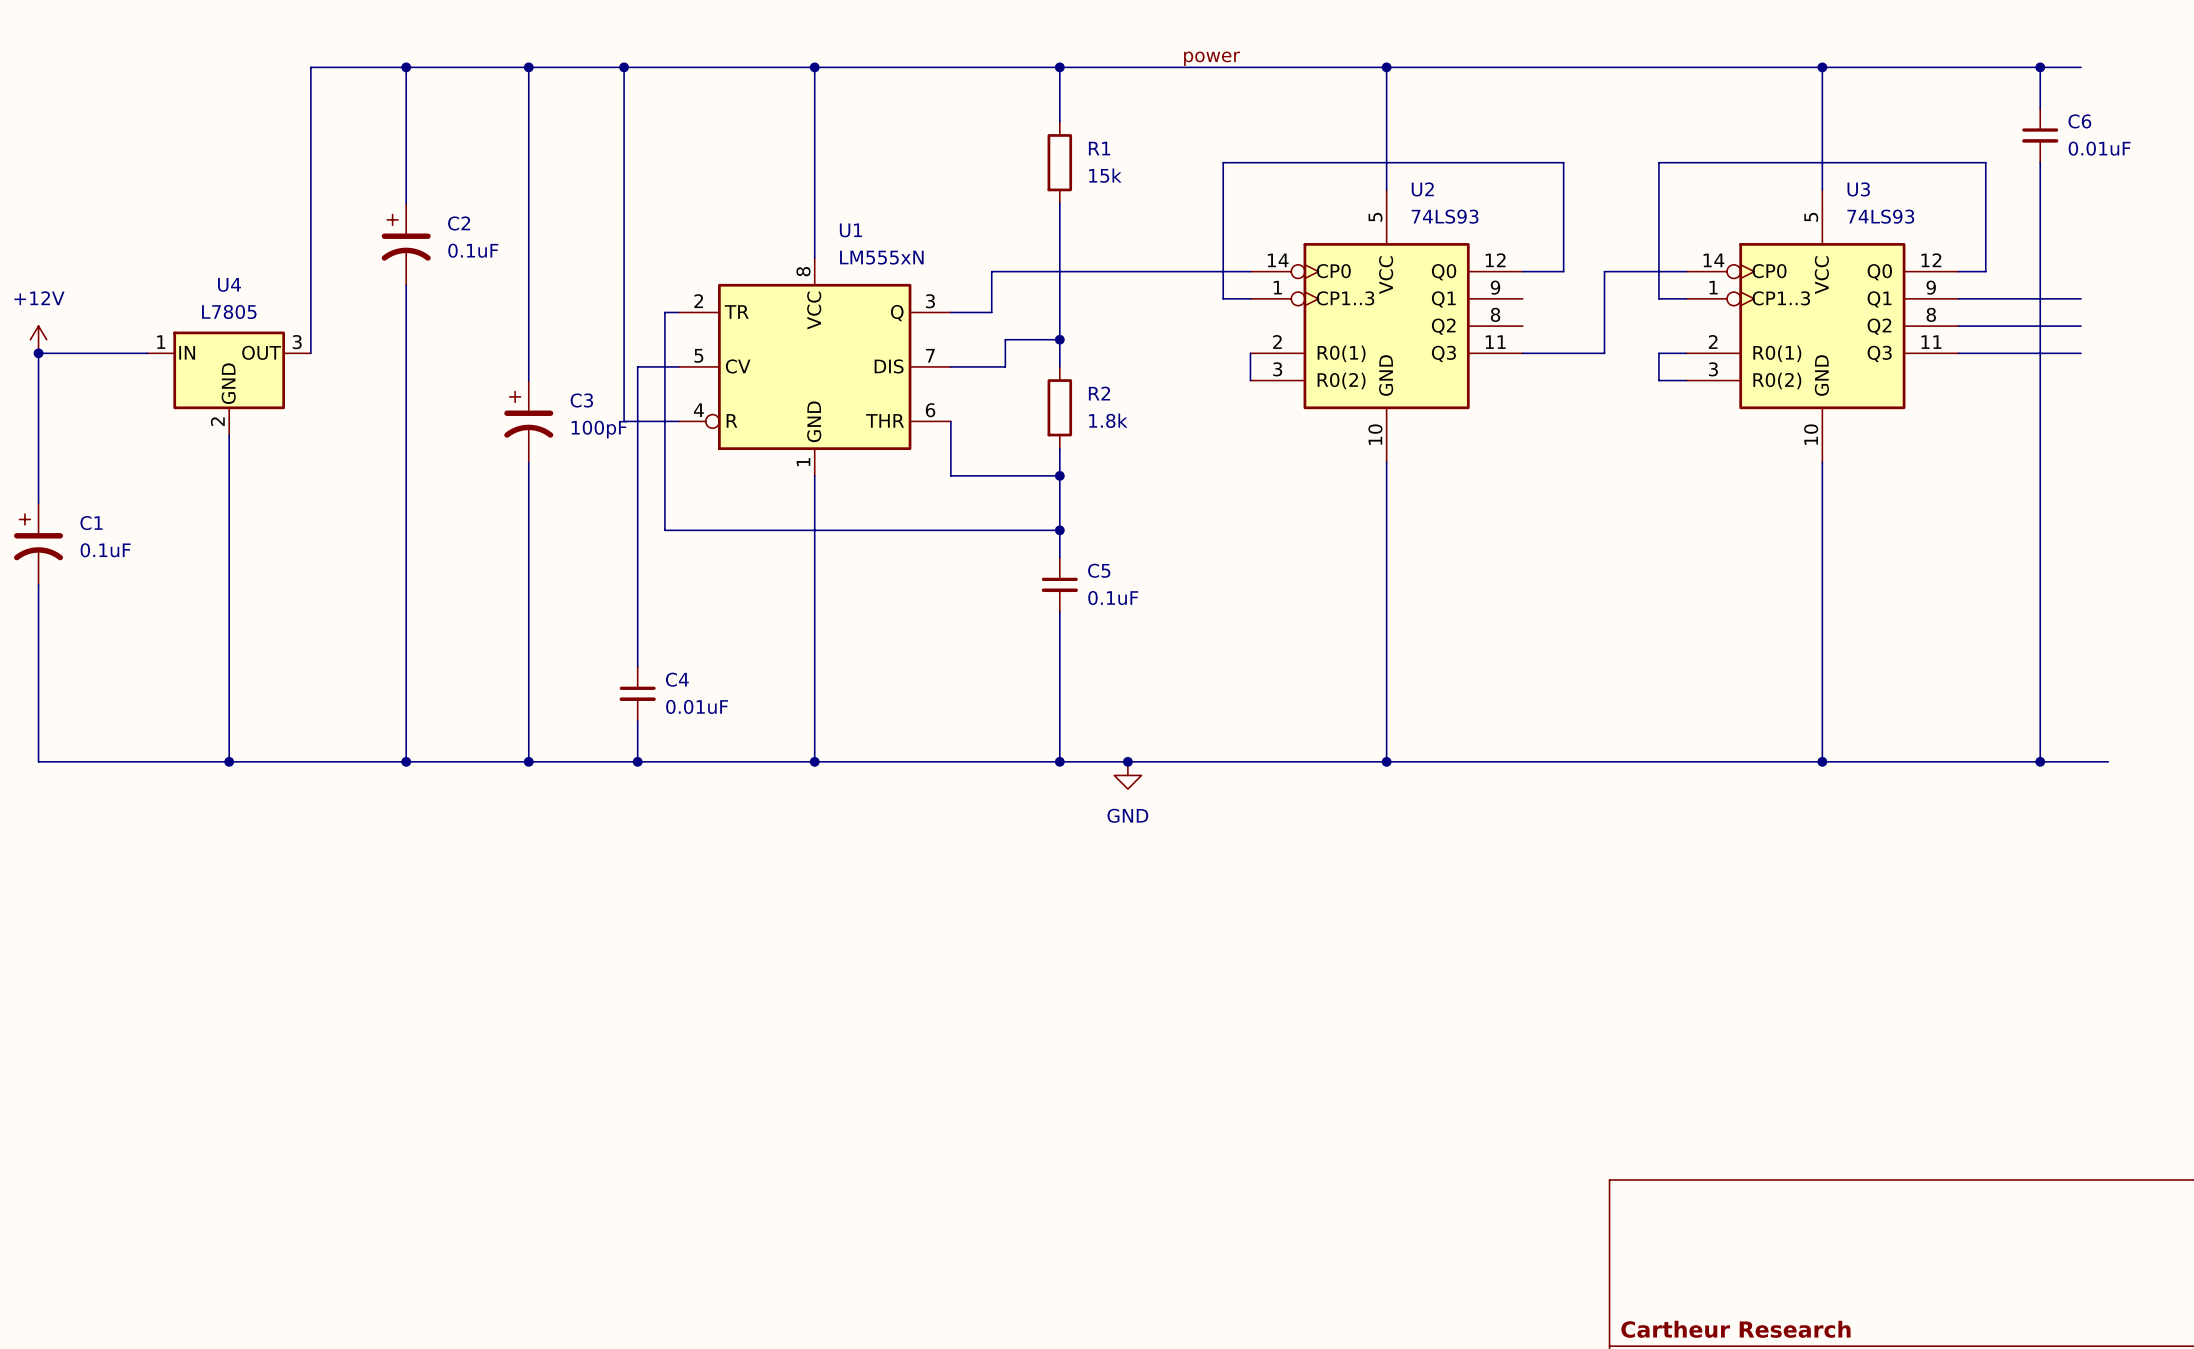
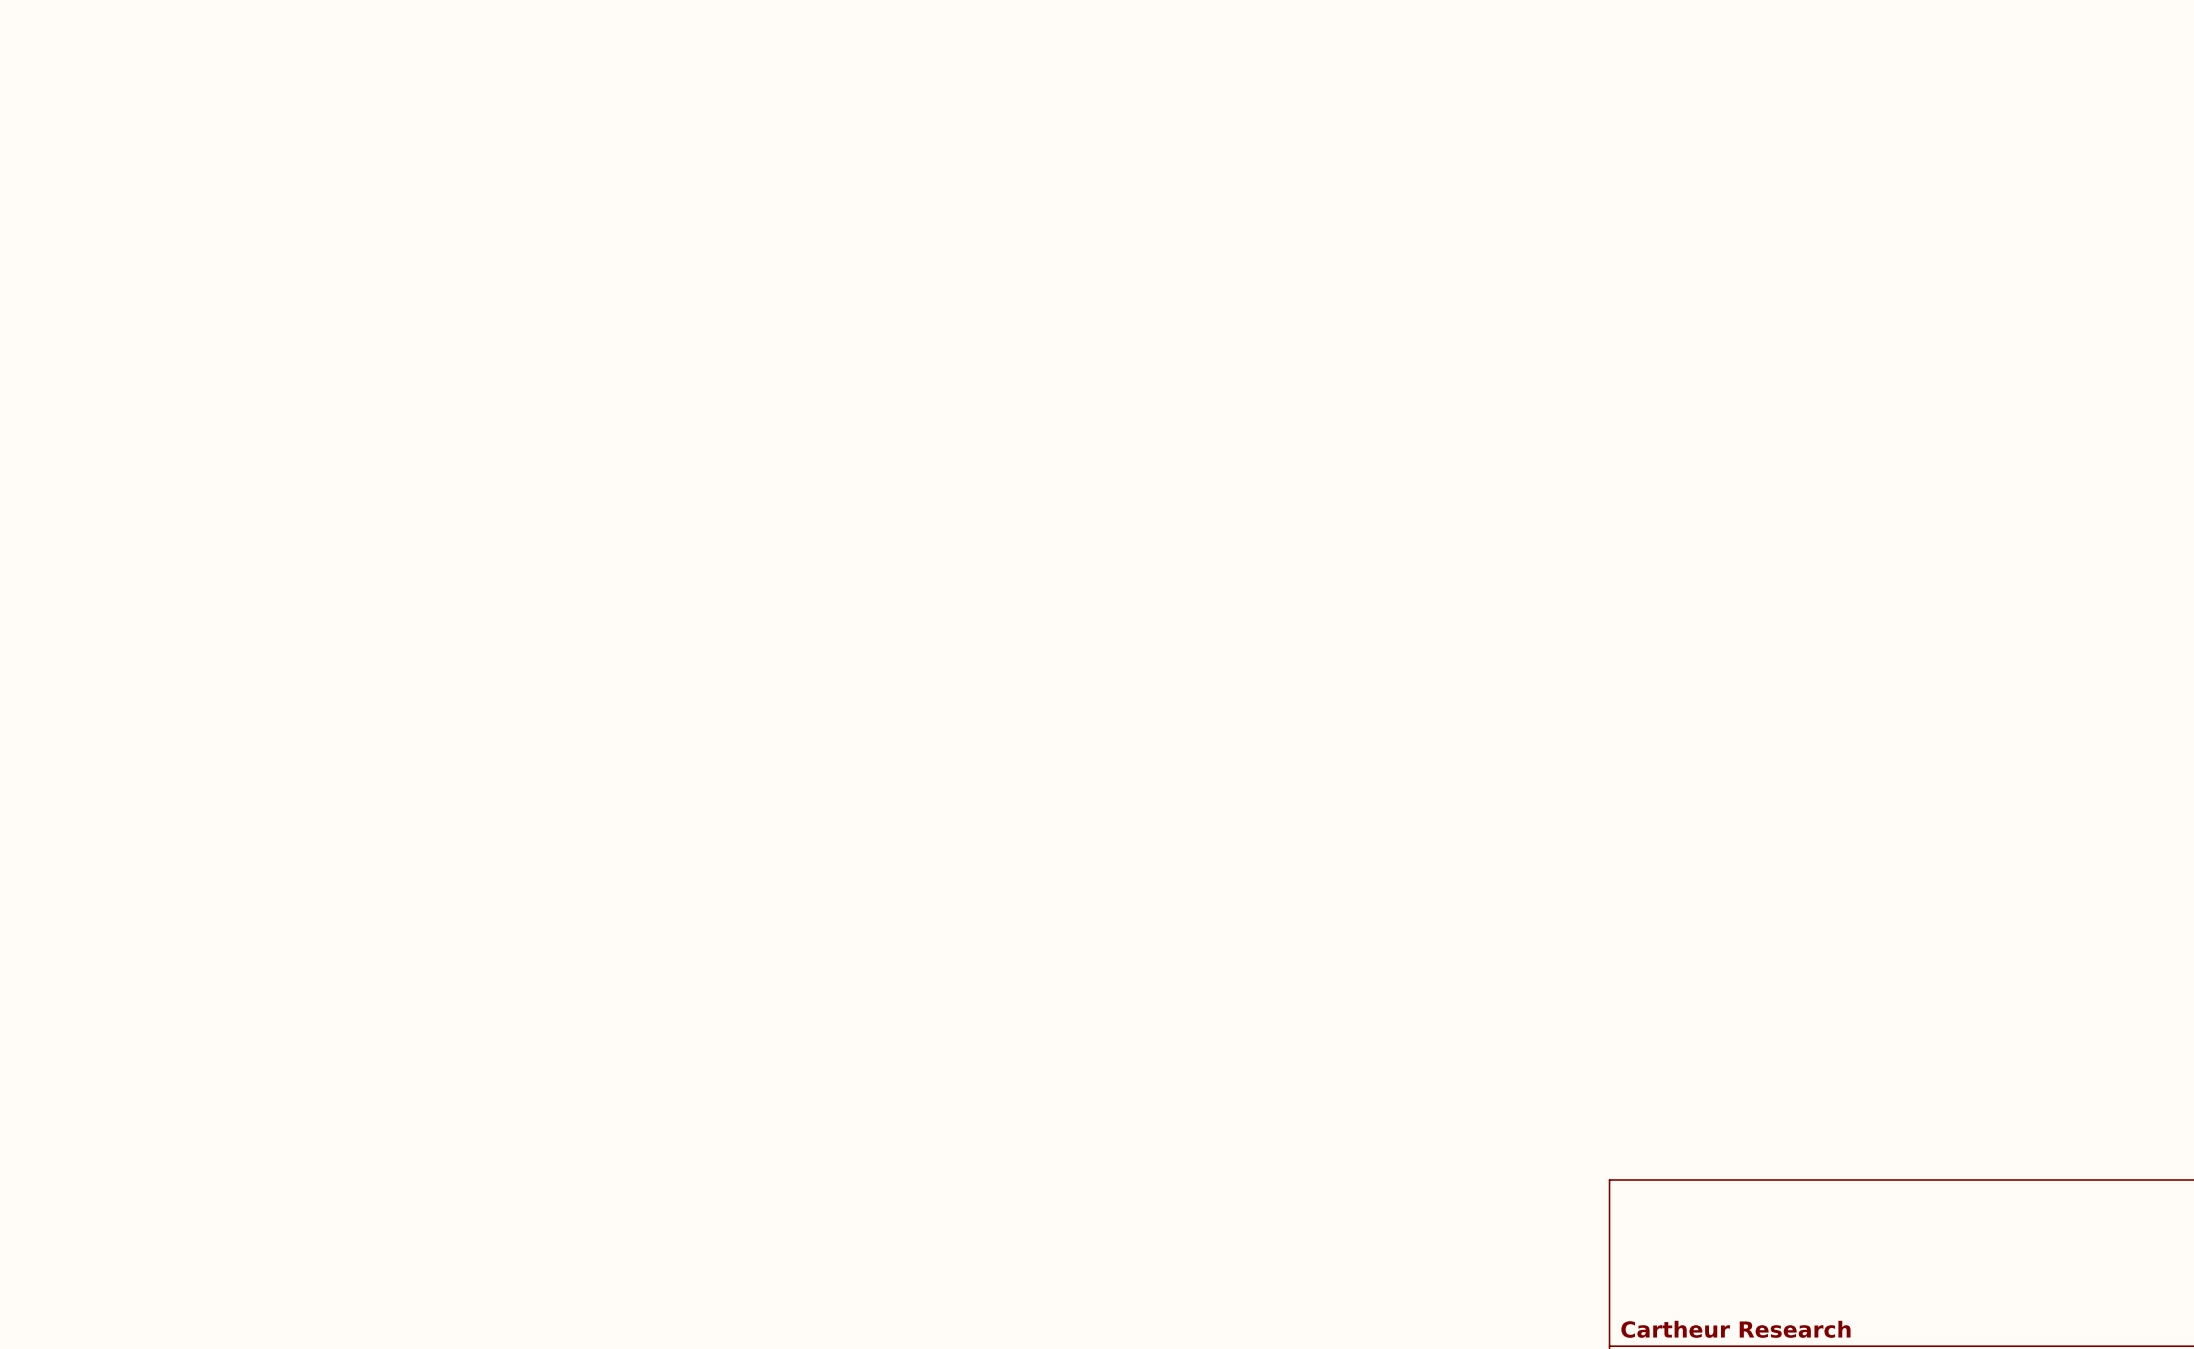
label: power (1212, 58) -> none
wire: (406, 67) (406, 203) -> none
junction: (406, 67) -> none
wire: (528, 67) (528, 380) -> none
junction: (528, 67) -> none
wire: (624, 67) (624, 421) (678, 421) -> none
junction: (624, 67) -> none
wire: (814, 67) (814, 258) -> none
junction: (814, 67) -> none
wire: (1059, 67) (1059, 121) -> none
junction: (1059, 67) -> none
wire: (1386, 67) (1386, 189) -> none
junction: (1386, 67) -> none
wire: (1822, 67) (1822, 189) -> none
junction: (1822, 67) -> none
wire: (2040, 67) (2040, 108) -> none
junction: (2040, 67) -> none
wire: (2081, 67) (310, 67) (310, 353) -> none
C6: 0.01uF (2040, 135) -> none
R1: 15k (1059, 162) -> none
wire: (2040, 162) (2040, 761) -> none
wire: (1059, 203) (1059, 366) -> none
C2: 0.1uF (406, 244) -> none
wire: (1250, 271) (991, 271) (991, 312) (950, 312) -> none
wire: (1522, 271) (1563, 271) (1563, 162) (1223, 162) (1223, 298) (1250, 298) -> none
wire: (1686, 271) (1604, 271) (1604, 353) (1522, 353) -> none
wire: (1958, 271) (1985, 271) (1985, 162) (1658, 162) (1658, 298) (1686, 298) -> none
wire: (406, 285) (406, 761) -> none
wire: (1958, 298) (2081, 298) -> none
wire: (678, 312) (664, 312) (664, 530) (1059, 530) -> none
U2: 74LS93 (1386, 326) -> none
U3: 74LS93 (1822, 326) -> none
wire: (1958, 326) (2081, 326) -> none
power symbol: +12V (38, 339) -> none
wire: (1059, 339) (1005, 339) (1005, 366) (950, 366) -> none
junction: (1059, 339) -> none
junction: (38, 353) -> none
wire: (147, 353) (38, 353) (38, 503) -> none
wire: (1250, 353) (1250, 380) -> none
wire: (1686, 353) (1658, 353) (1658, 380) (1686, 380) -> none
wire: (1958, 353) (2081, 353) -> none
wire: (678, 366) (637, 366) (637, 666) -> none
U1: LM555xN (814, 366) -> none
U4: L7805 (229, 383) -> none
R2: 1.8k (1059, 407) -> none
C3: 100pF (528, 421) -> none
wire: (950, 421) (950, 475) (1059, 475) -> none
wire: (229, 435) (229, 761) -> none
wire: (1059, 448) (1059, 557) -> none
wire: (528, 462) (528, 761) -> none
wire: (1386, 462) (1386, 761) -> none
wire: (1822, 462) (1822, 761) -> none
wire: (814, 475) (814, 761) -> none
junction: (1059, 475) -> none
junction: (1059, 530) -> none
C1: 0.1uF (38, 543) -> none
wire: (38, 584) (38, 761) (2108, 761) -> none
C5: 0.1uF (1059, 584) -> none
wire: (1059, 612) (1059, 761) -> none
C4: 0.01uF (637, 693) -> none
wire: (637, 720) (637, 761) -> none
junction: (229, 761) -> none
junction: (406, 761) -> none
junction: (528, 761) -> none
junction: (637, 761) -> none
junction: (814, 761) -> none
junction: (1059, 761) -> none
junction: (1127, 761) -> none
junction: (1386, 761) -> none
junction: (1822, 761) -> none
junction: (2040, 761) -> none
power symbol: GND (1127, 775) -> none

